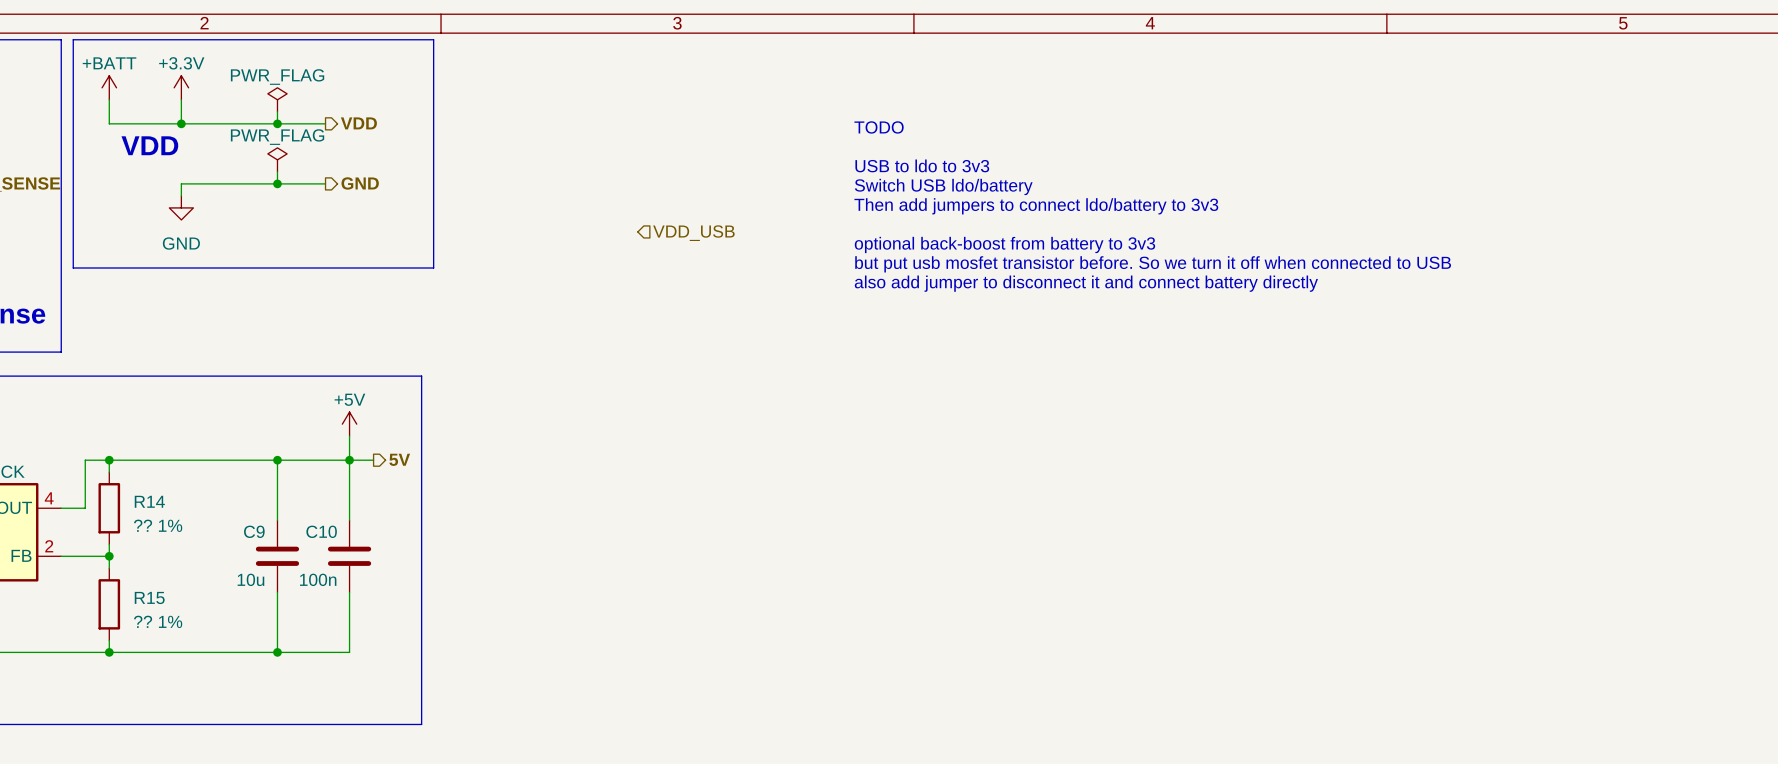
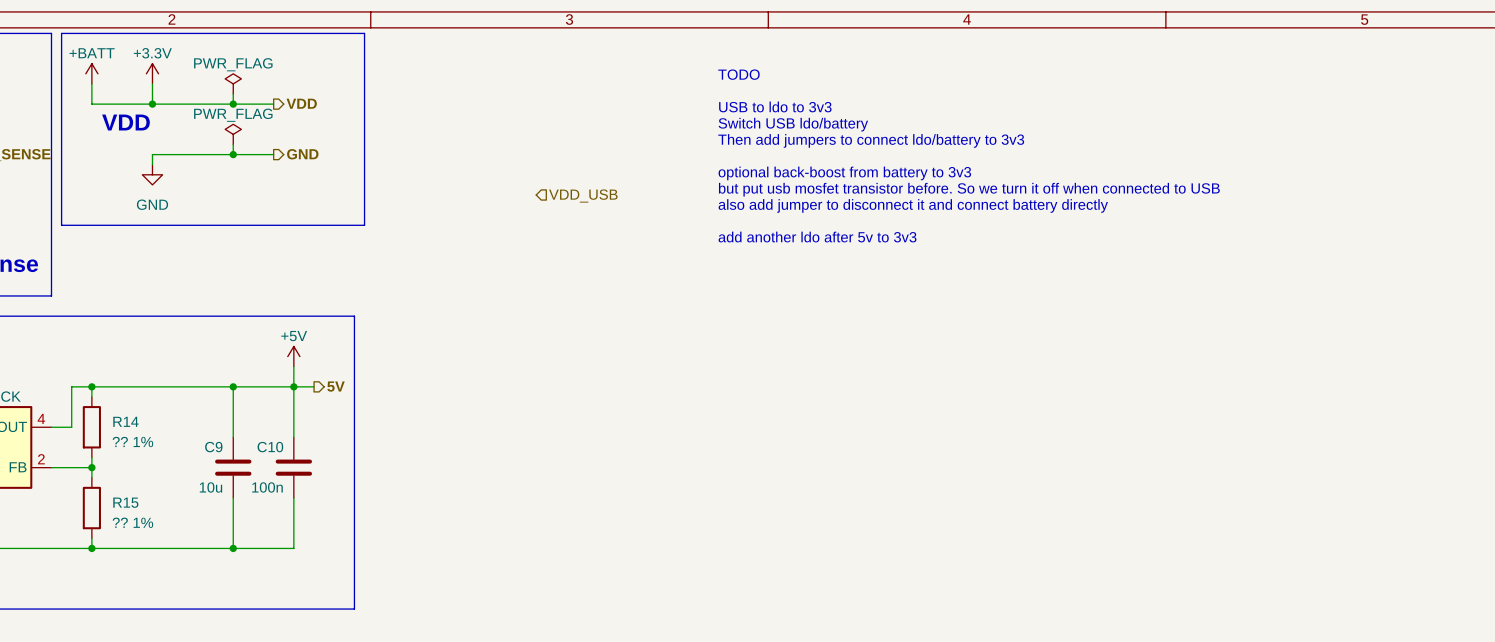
text: none -> TODO (738, 74)
text: TODO (879, 127) -> USB to ldo to 3v3 (775, 106)
text: USB to ldo to 3v3 (922, 165) -> Then add jumpers to connect ldo/battery to 3v3 (871, 140)
text position: Switch USB ldo/battery (943, 186) -> Switch USB ldo/battery (793, 124)
text: Then add jumpers to connect ldo/battery to 3v3 (1036, 206) -> optional back-boost from battery to 3v3 (844, 173)
text: optional back-boost from battery to 3v3 (1004, 244) -> also add jumper to disconnect it and connect battery directly (913, 205)
text position: but put usb mosfet transistor before. So we turn it off when connected to USB (1153, 264) -> but put usb mosfet transistor before. So we turn it off when connected to USB (969, 189)
text: also add jumper to disconnect it and connect battery directly (1086, 283) -> add another ldo after 5v to 3v3 (817, 237)

